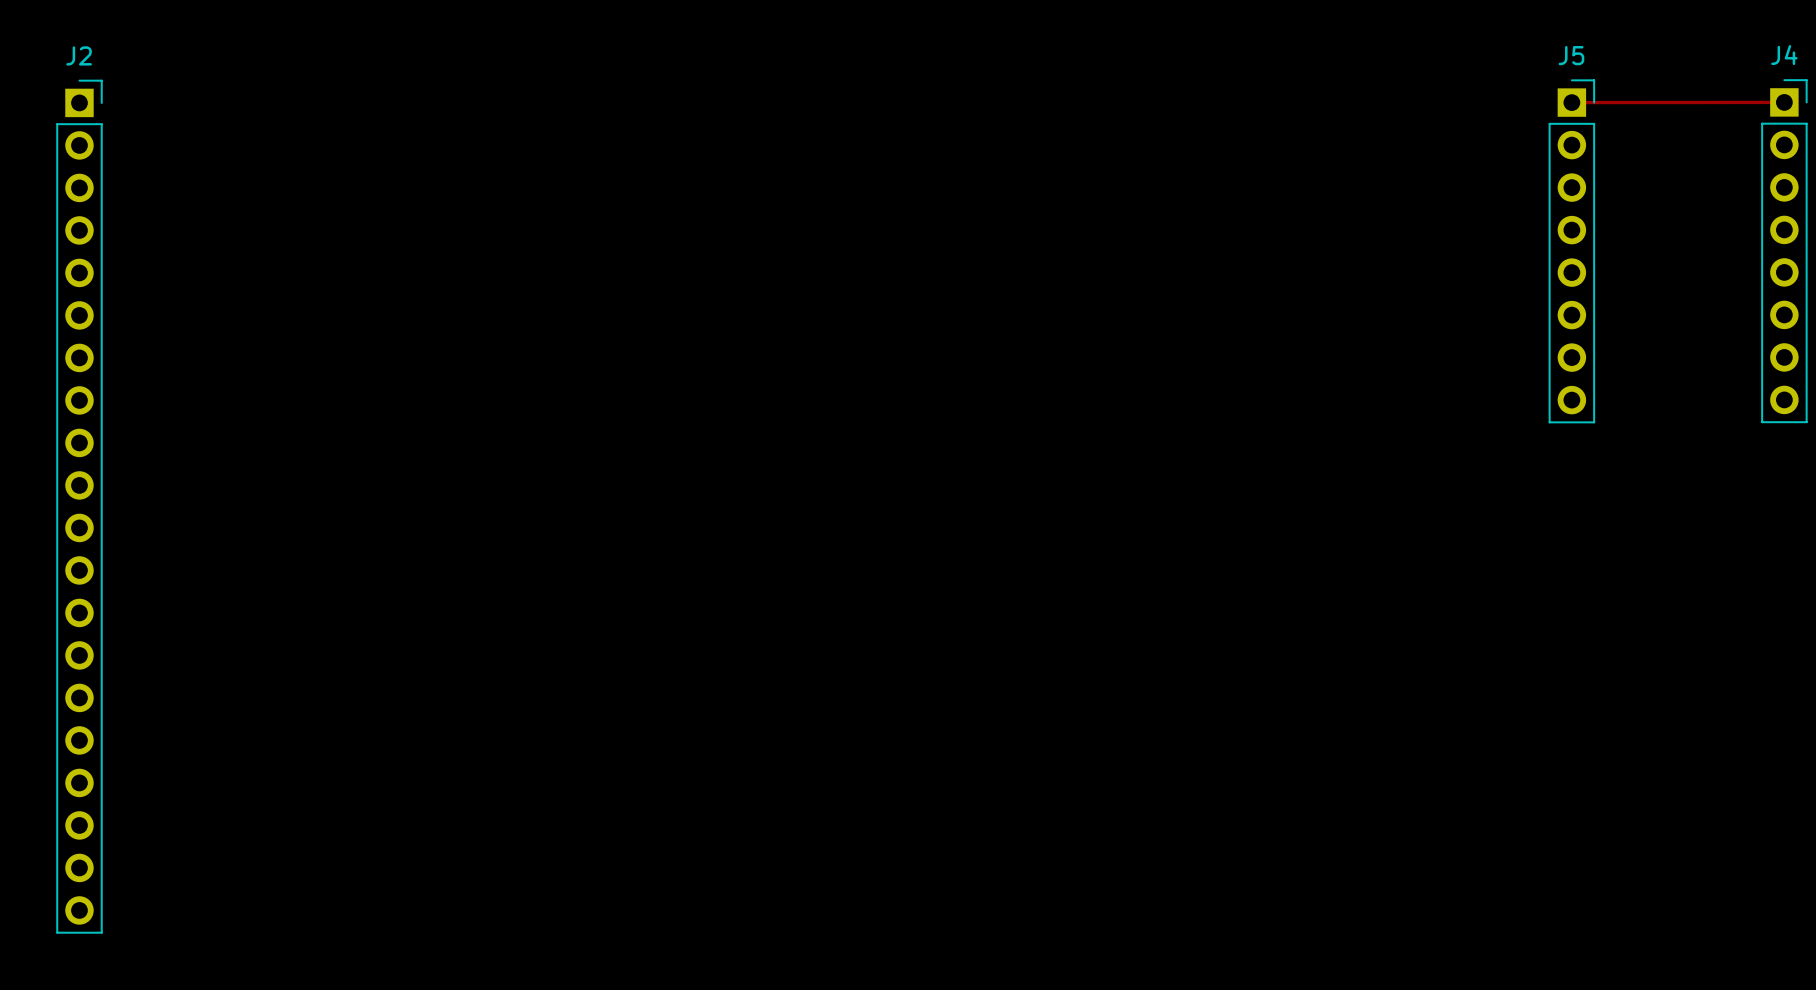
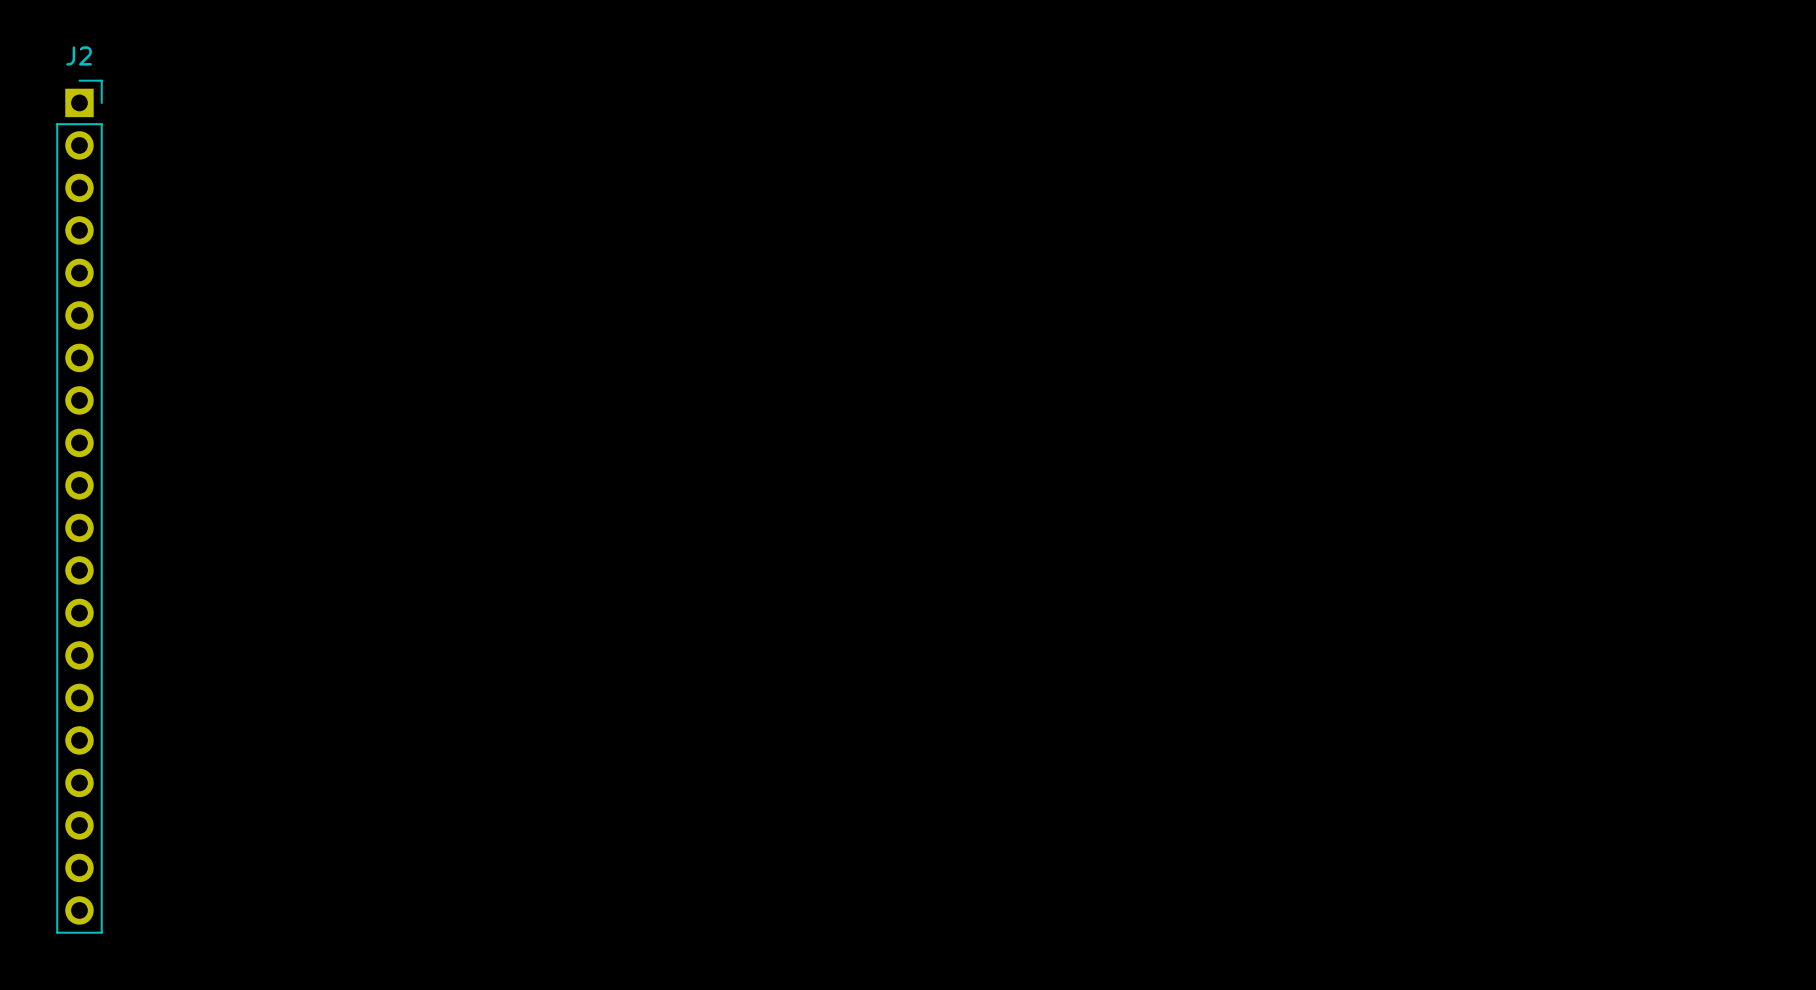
track: (1784, 102) (1571, 102) -> none
J5: (1571, 251) -> none
J4: (1784, 251) -> none

